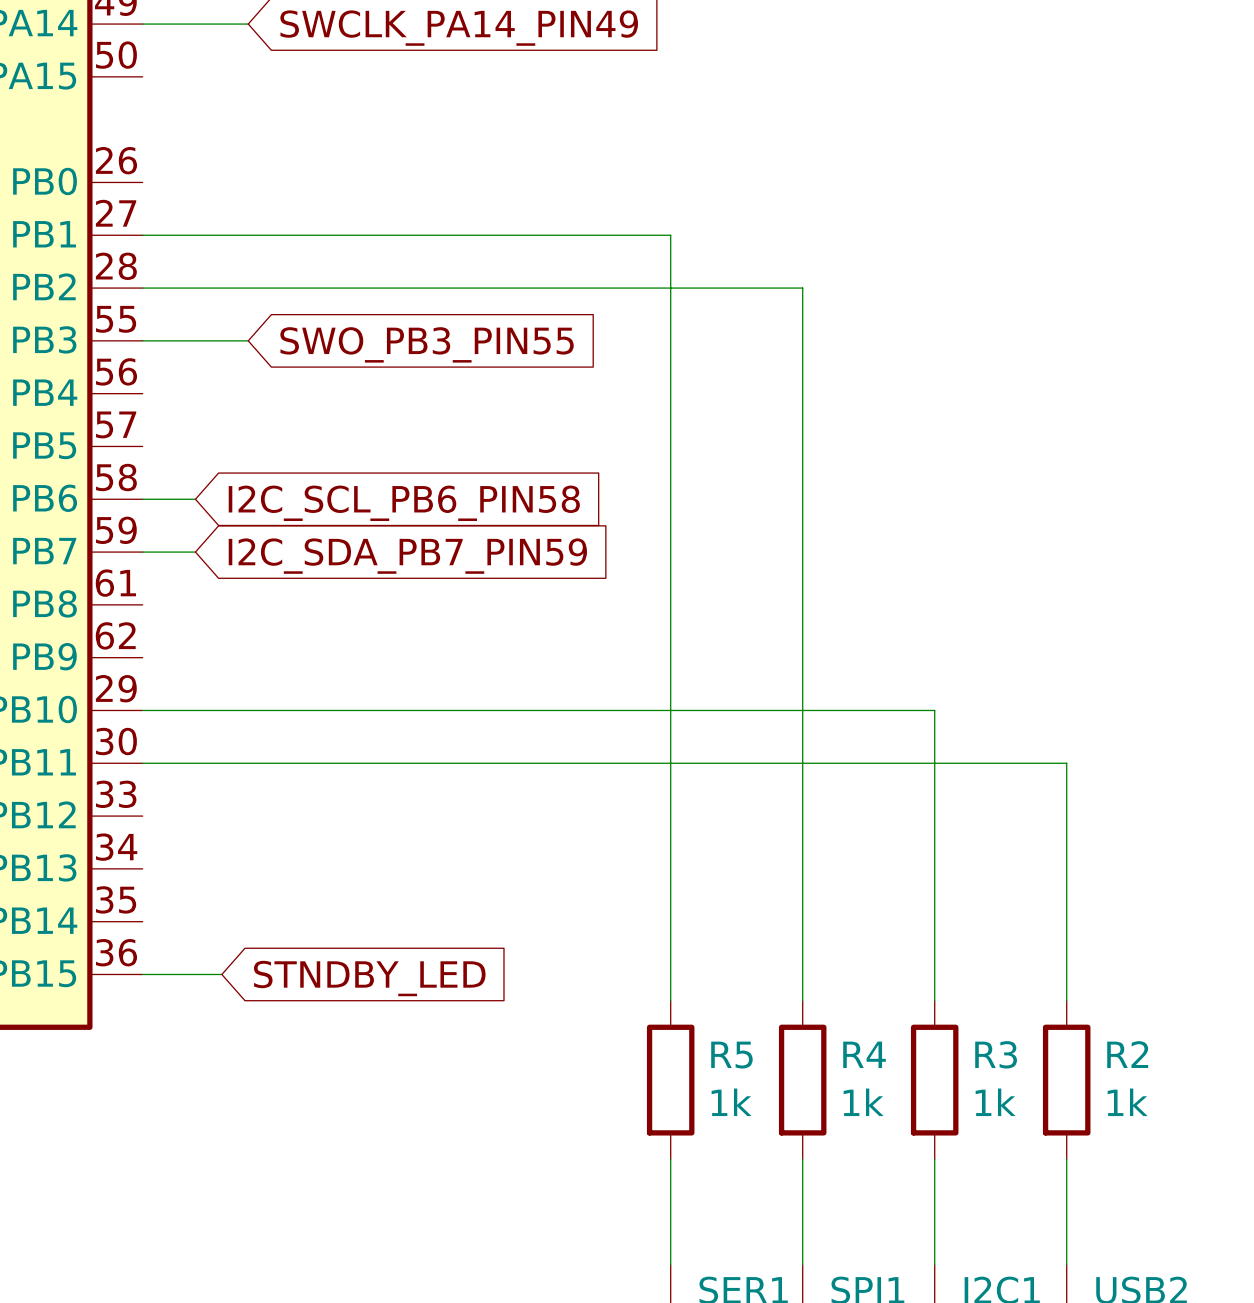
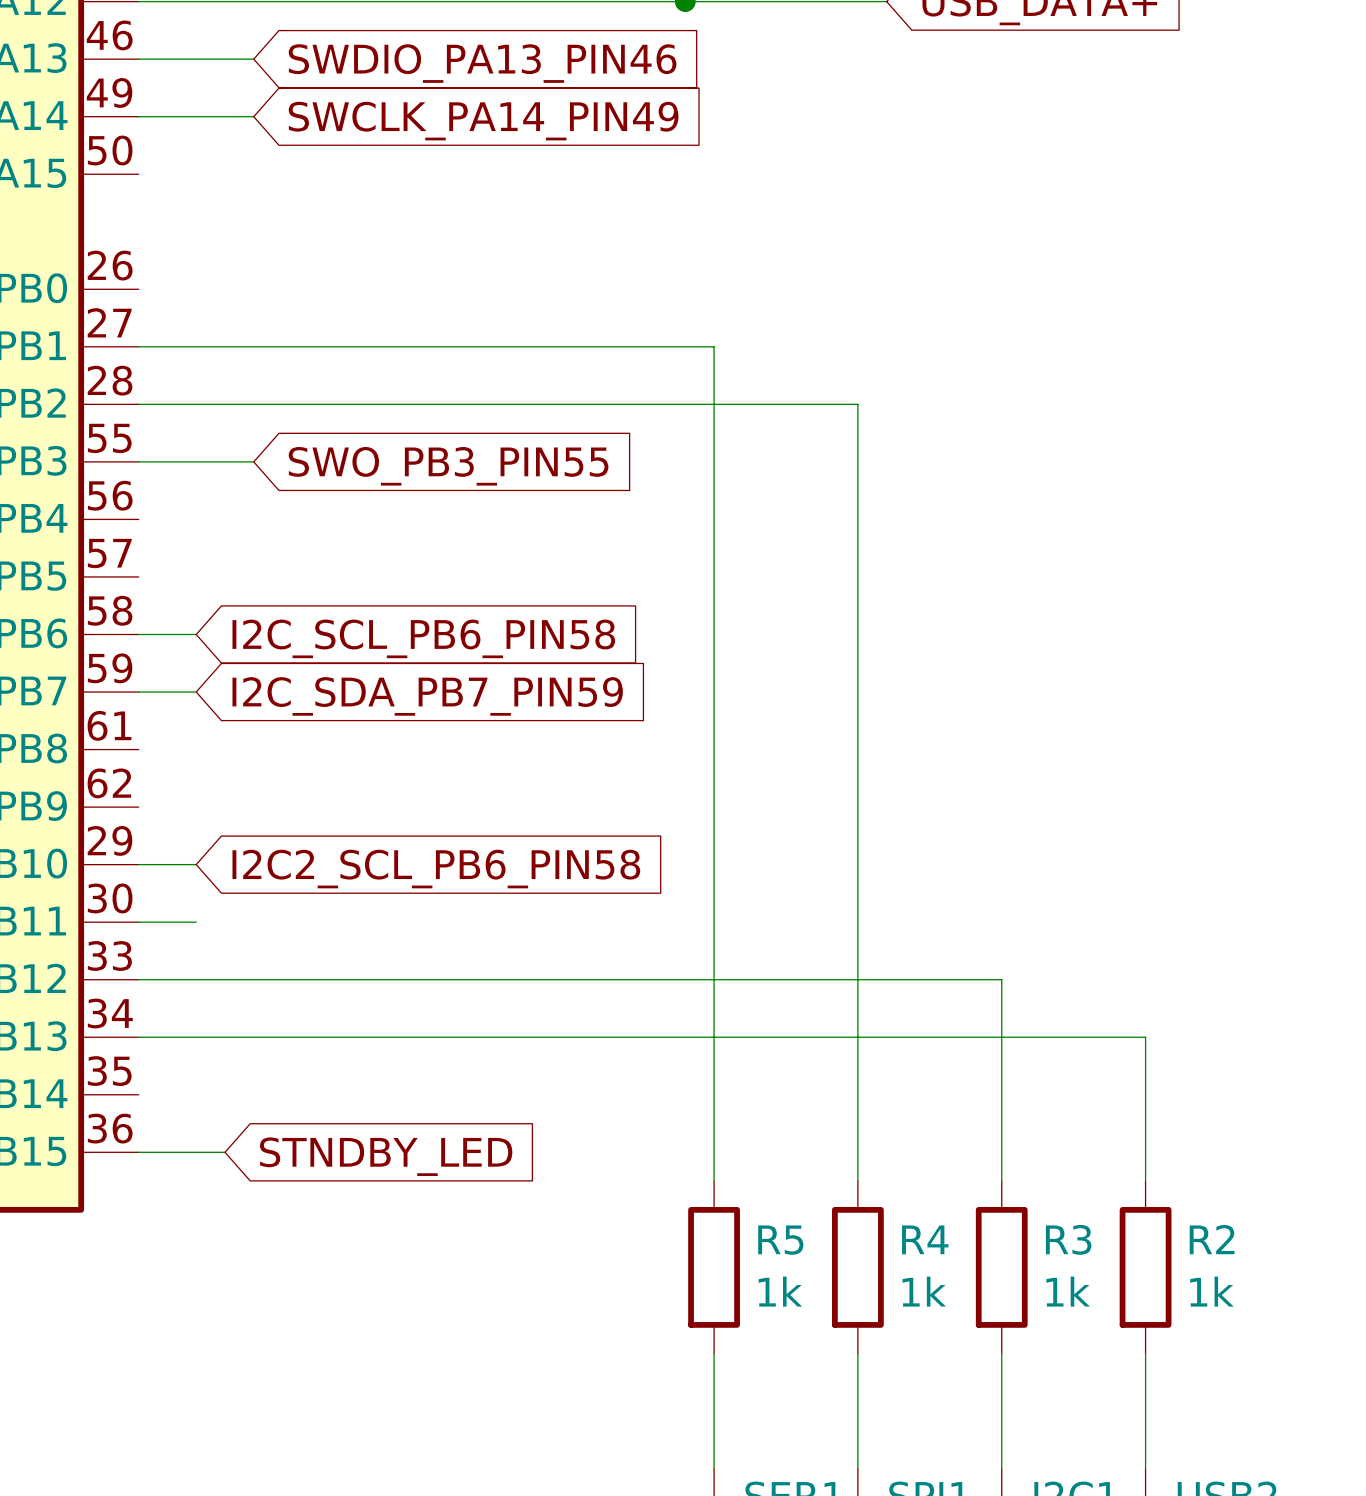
wire: (195, 710) (934, 710) (934, 816) -> (138, 979) (1001, 979)
global label: none -> I2C2_SCL_PB6_PIN58 (436, 869)
wire: (195, 763) (1066, 763) (1066, 868) -> (138, 1037) (1145, 1037)

